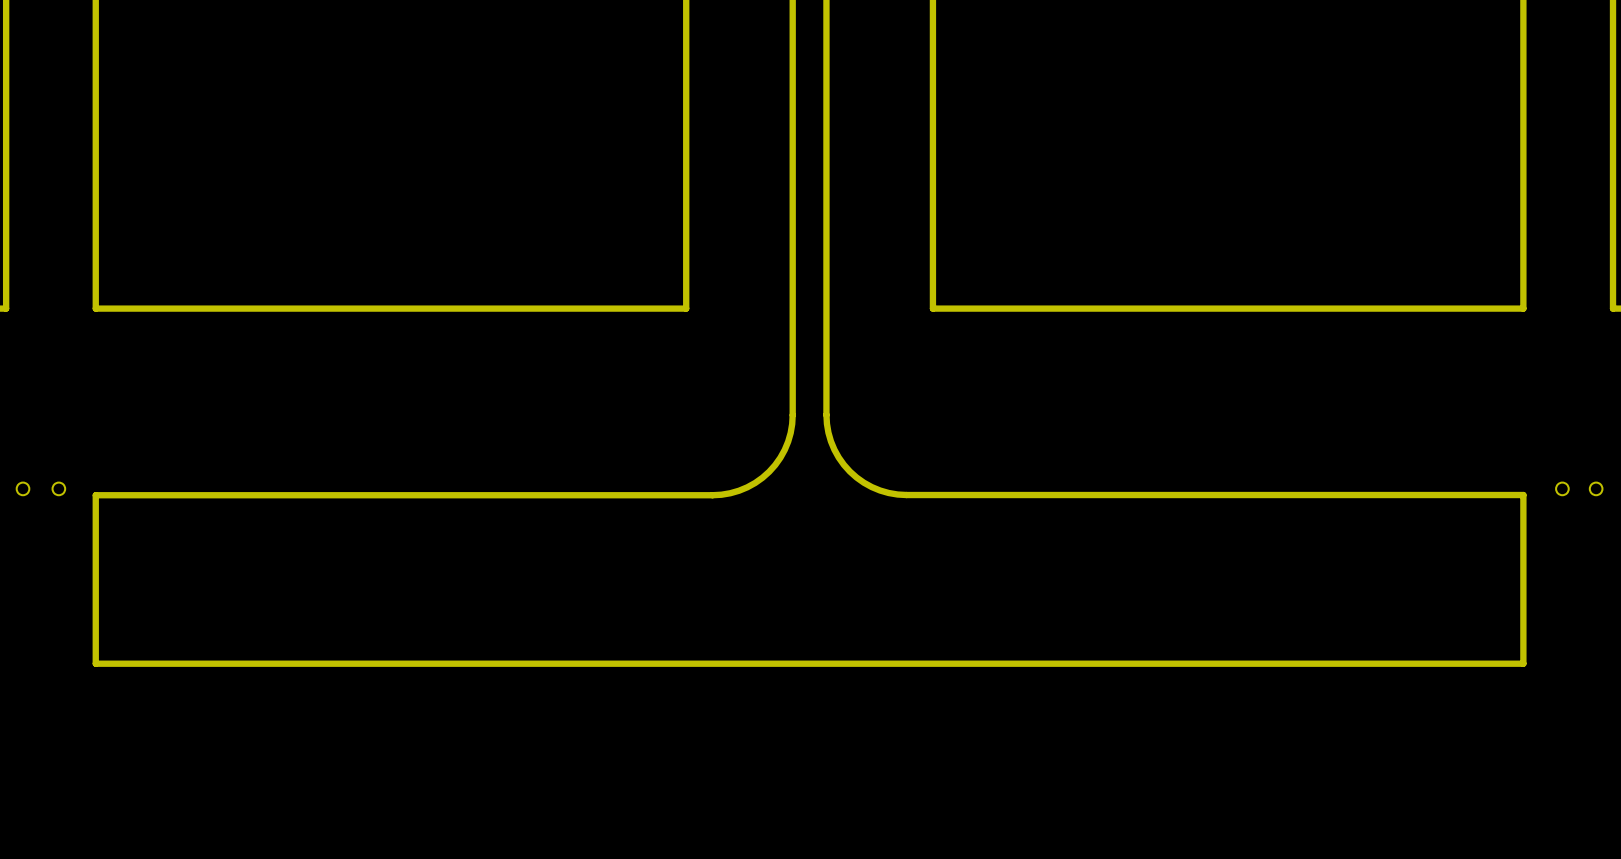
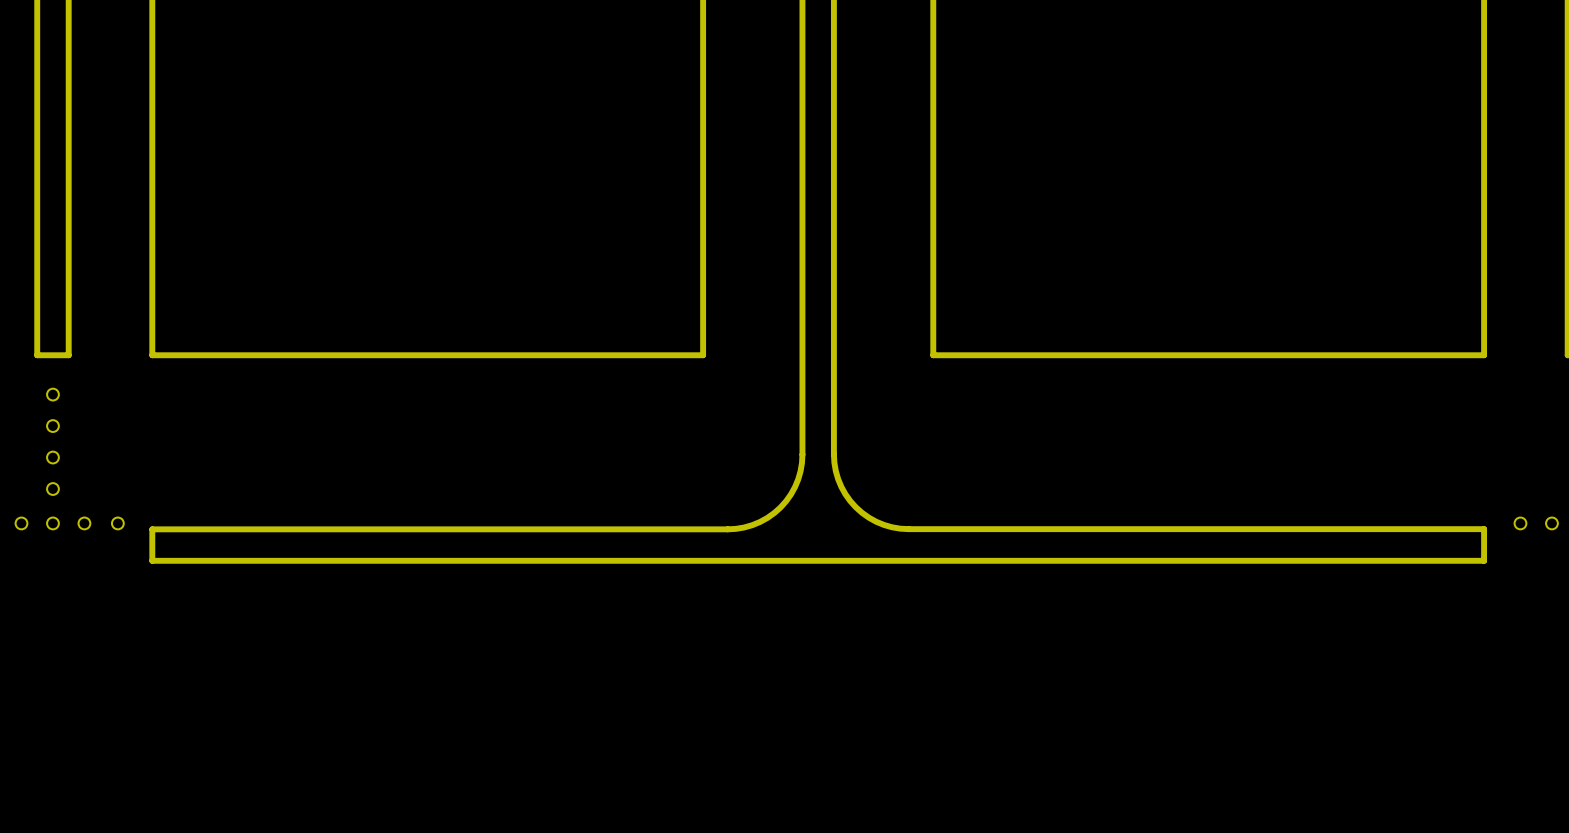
board edge: (95, 528) (95, 663) (1523, 663) (1523, 528) -> (152, 560) (1484, 560)

